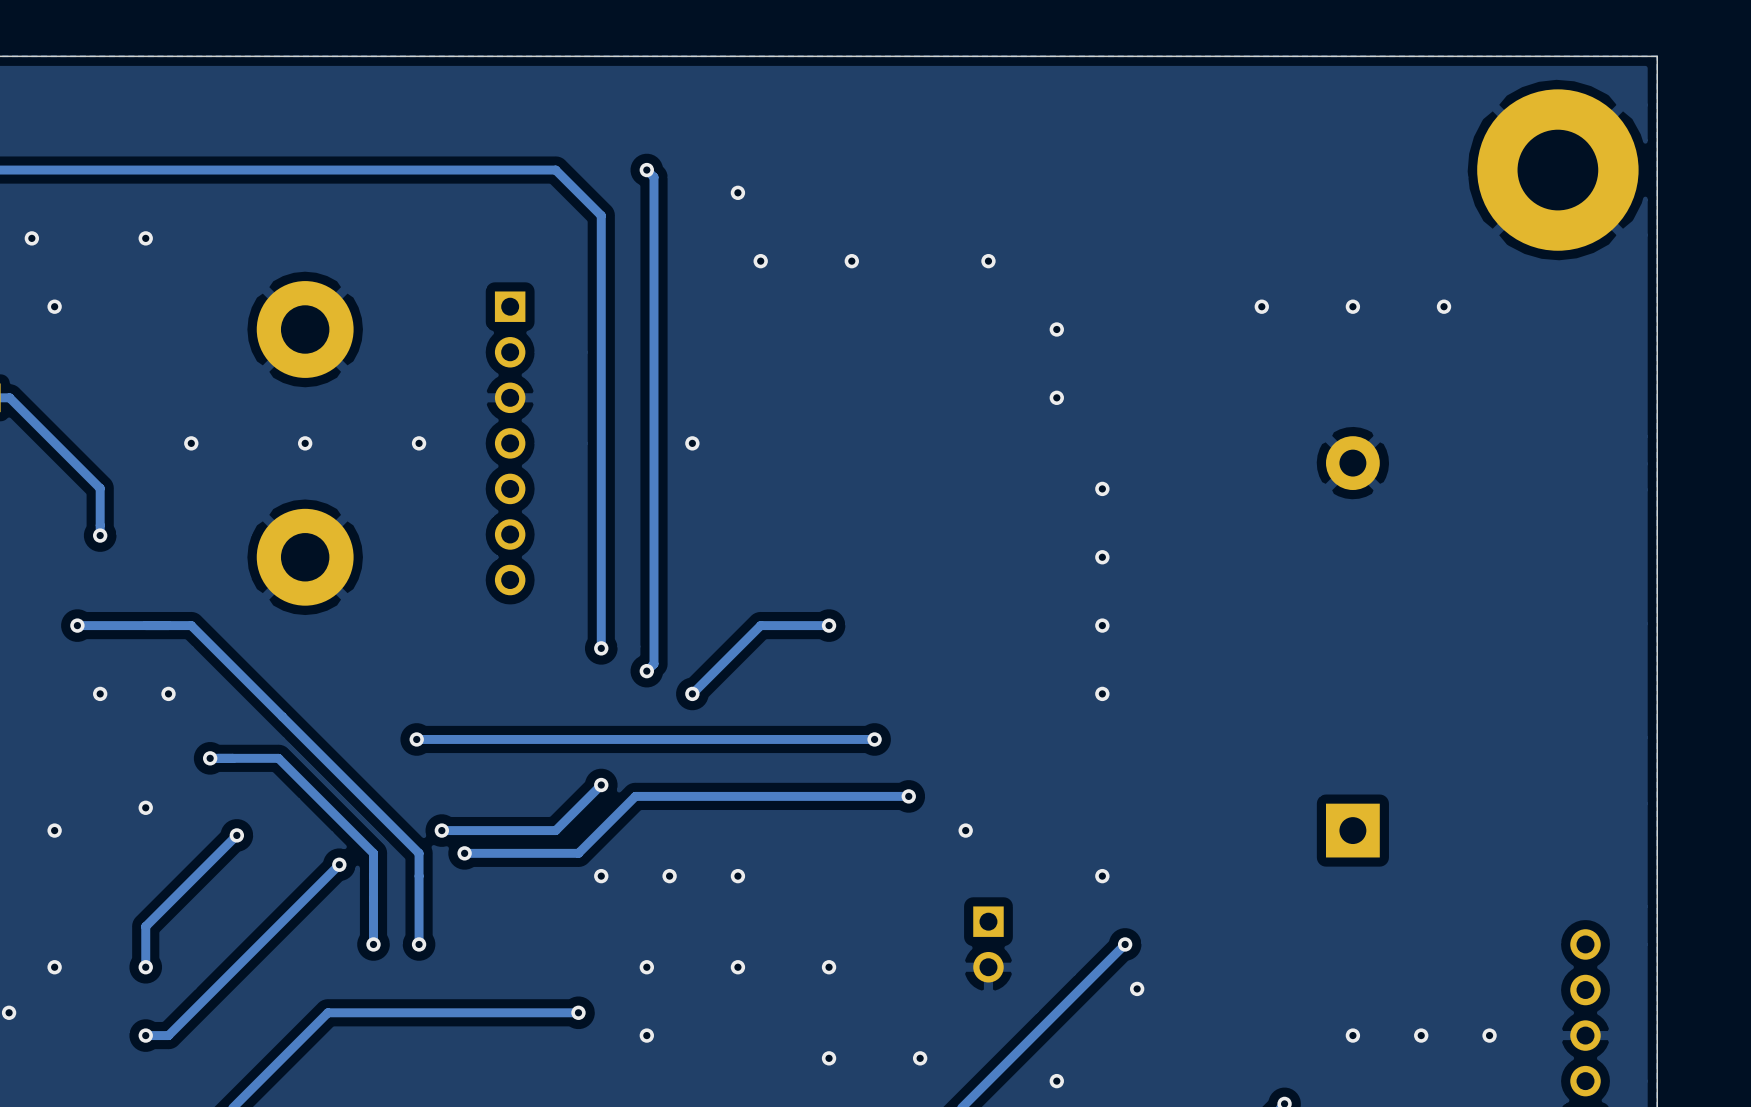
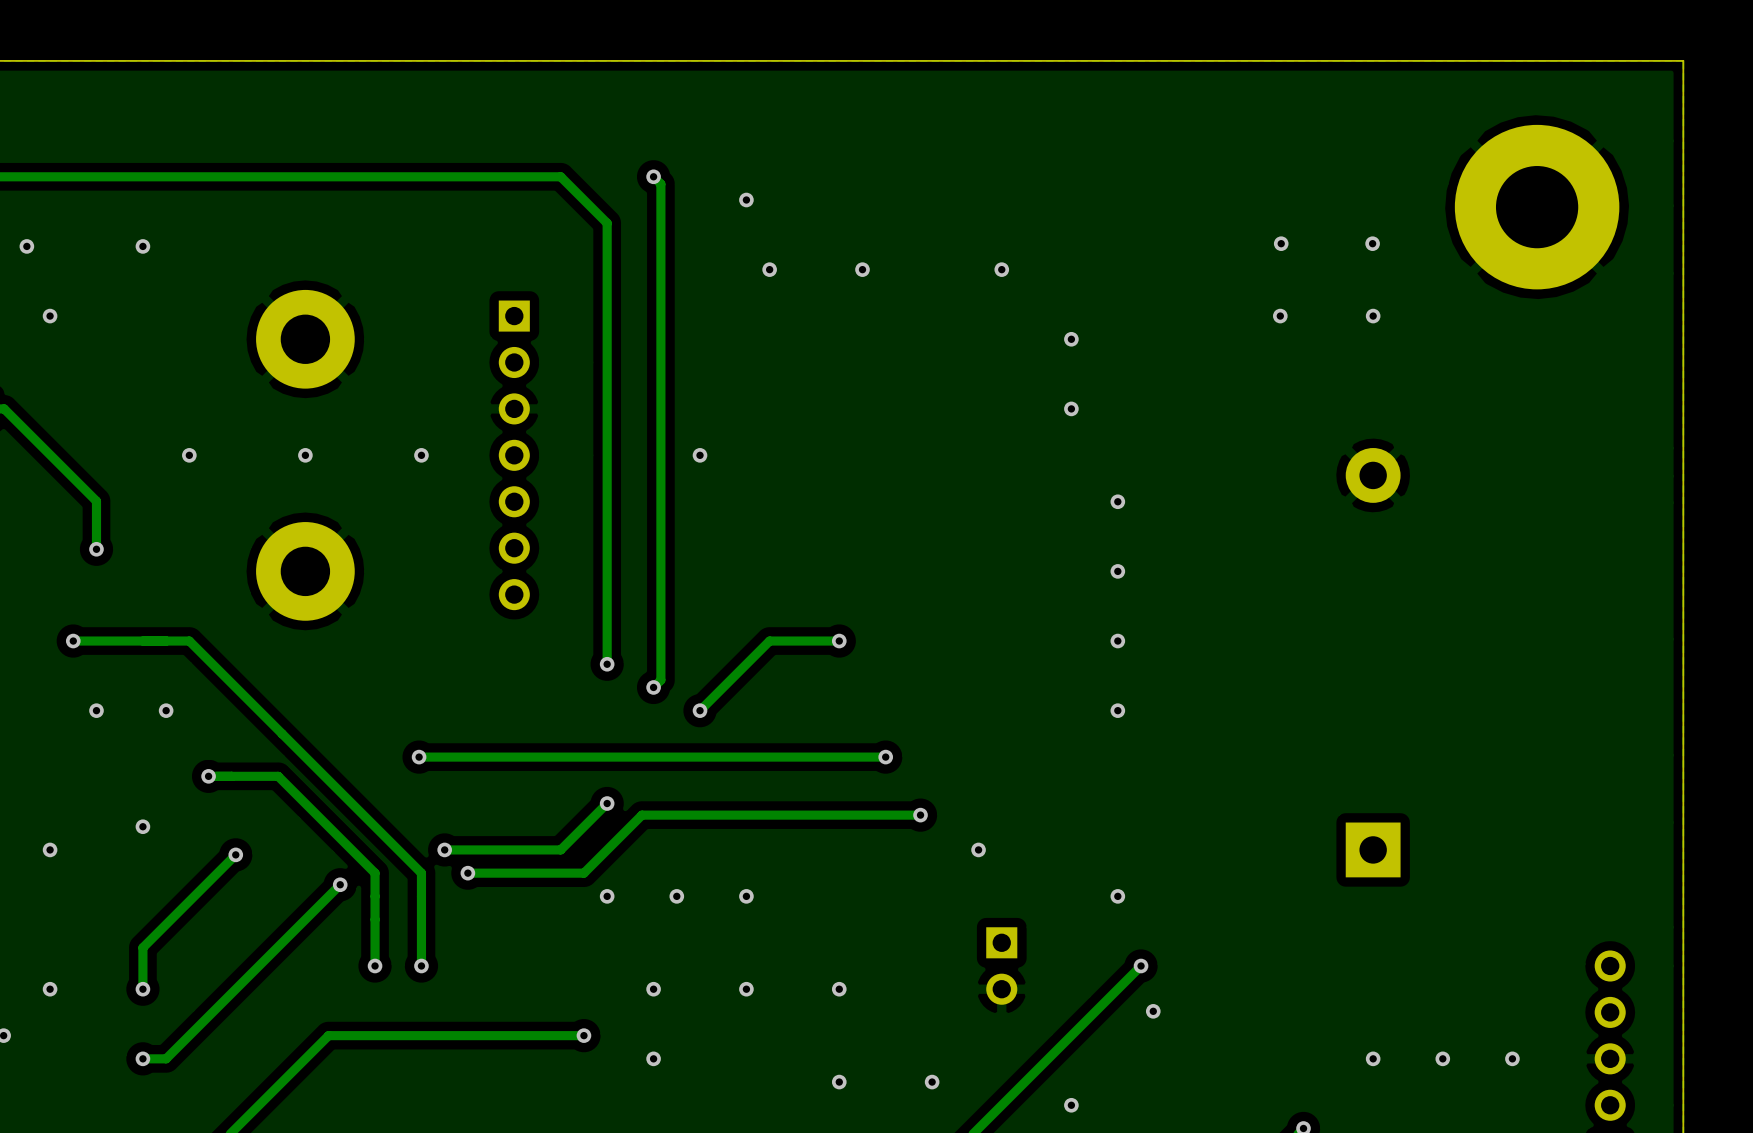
part position: (1557, 170) -> (1537, 207)
via: none -> (1281, 243)
via: none -> (1372, 243)
via: (1444, 306) -> none

